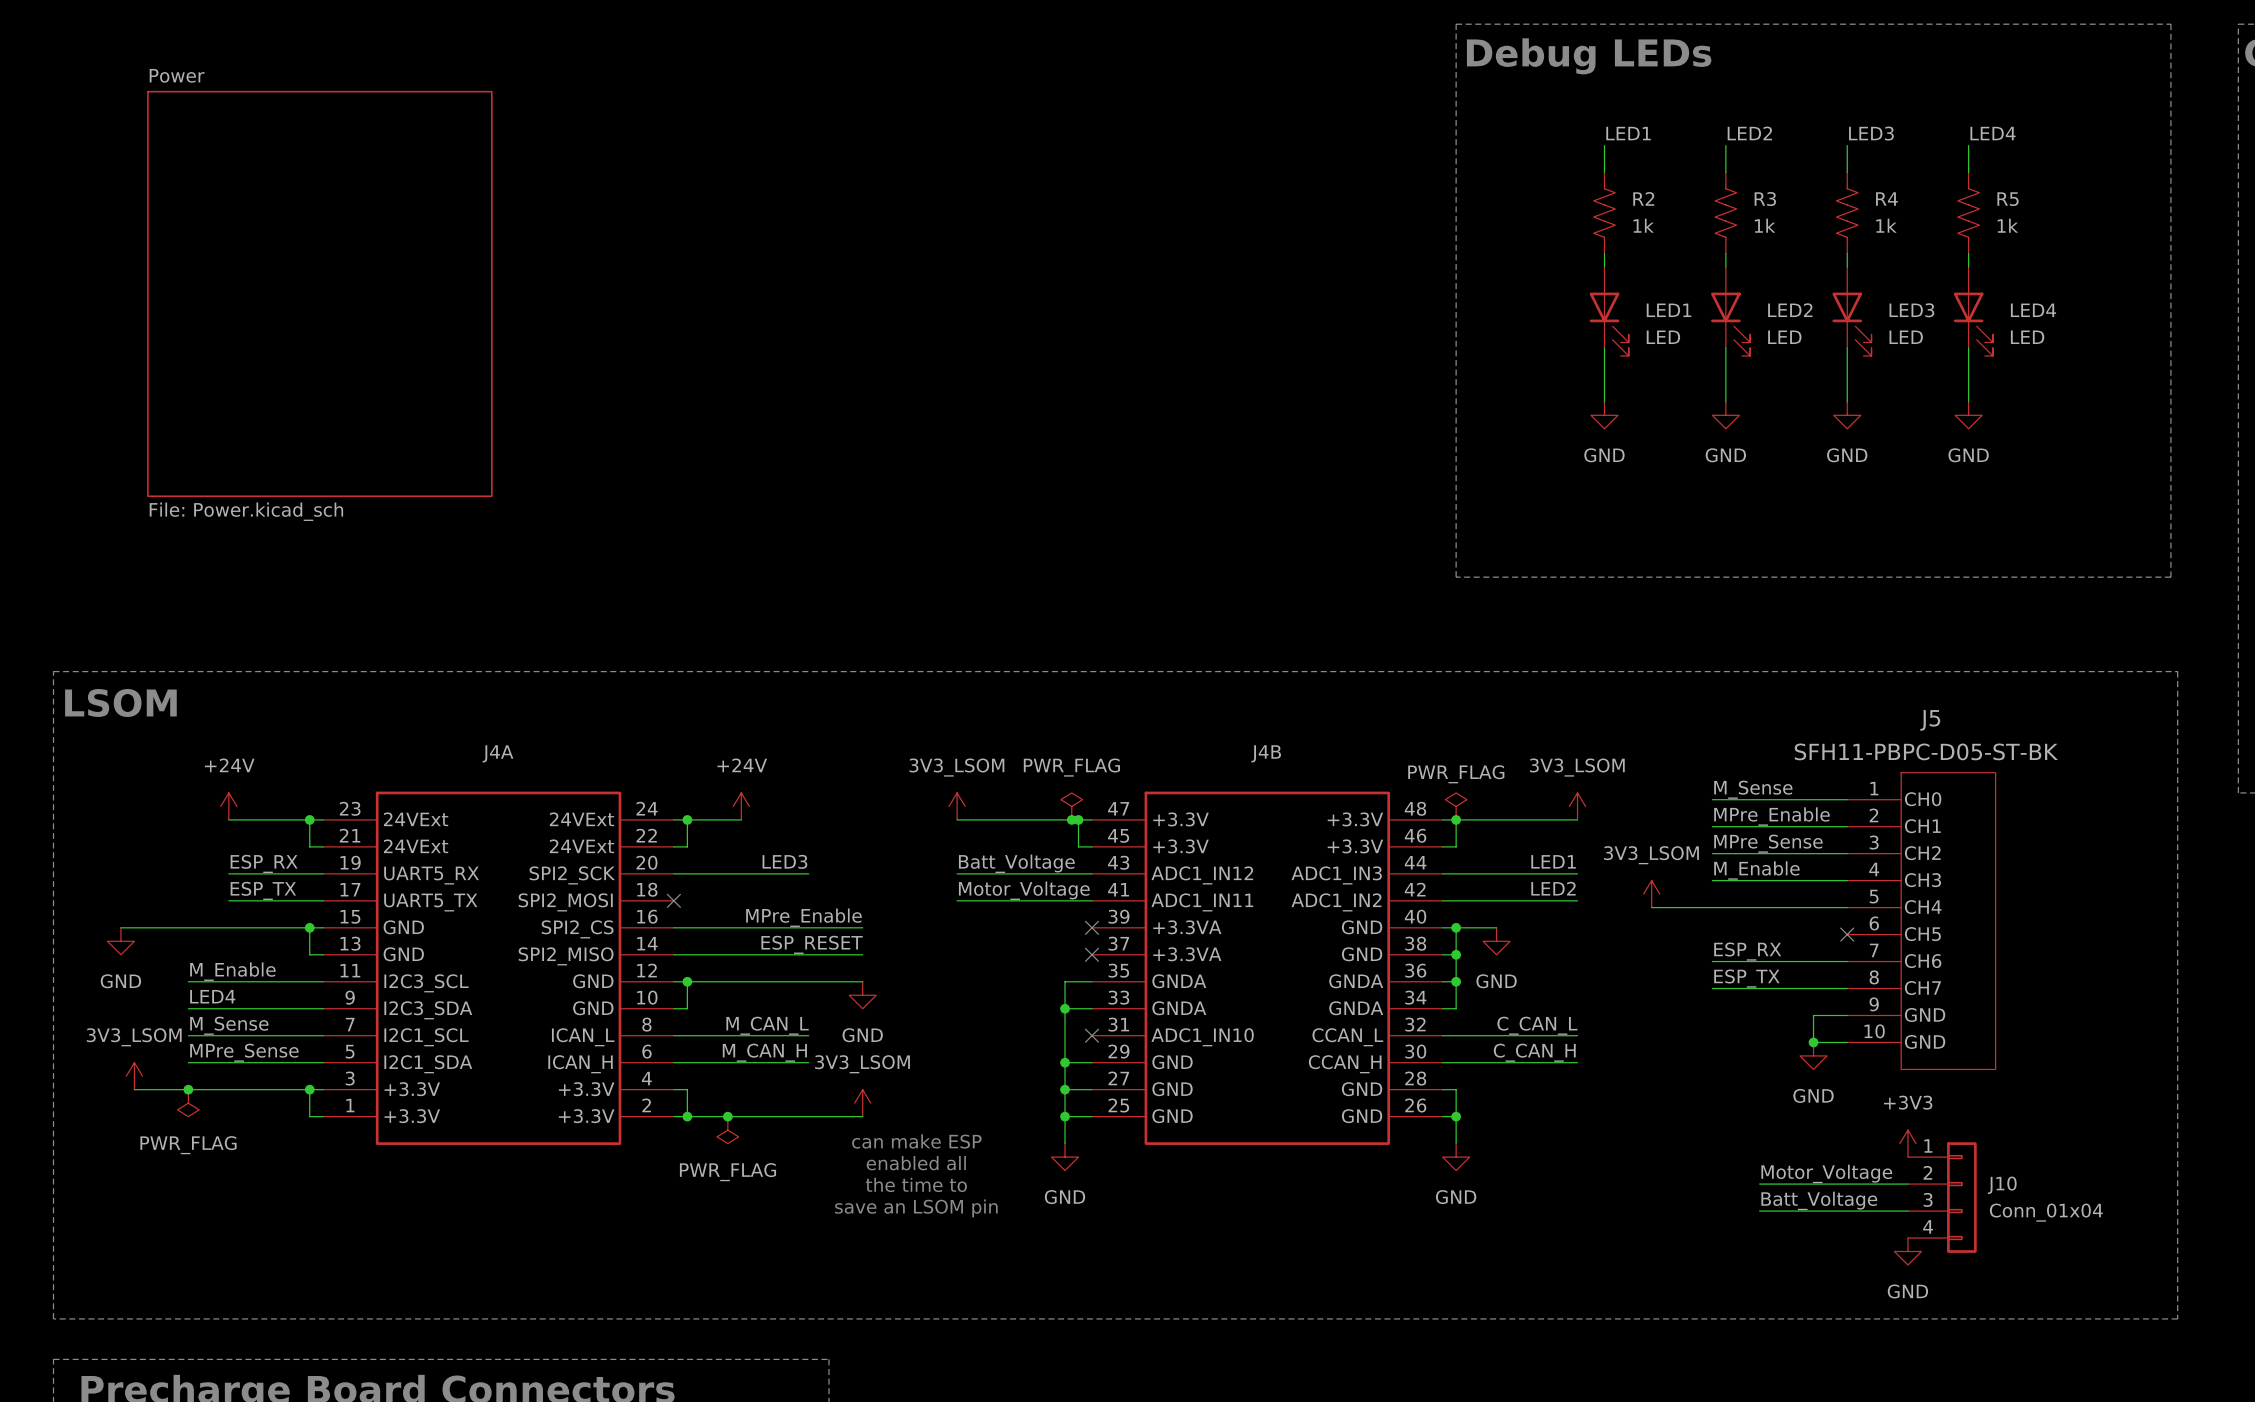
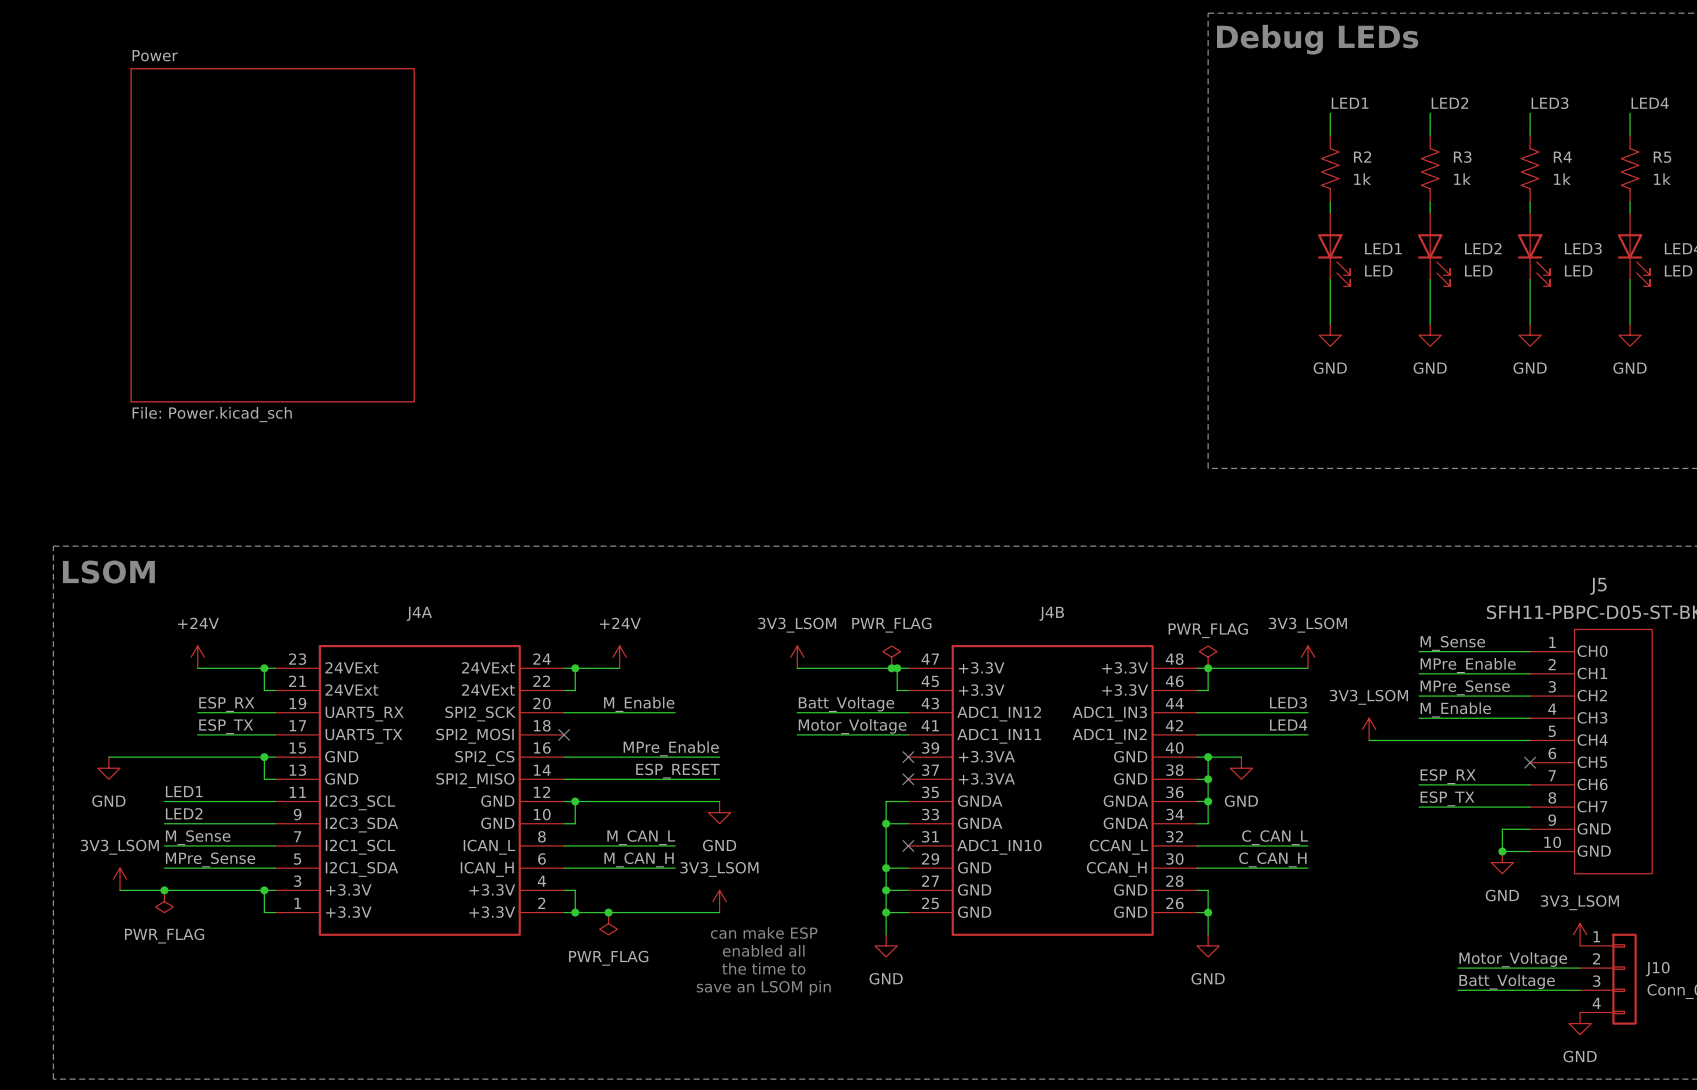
label: LED3 (784, 861) -> M_Enable (639, 704)
label: LED1 (1553, 861) -> LED3 (1288, 702)
label: LED2 (1553, 888) -> LED4 (1288, 725)
label: M_Enable (232, 971) -> LED1 (184, 791)
label: LED4 (212, 996) -> LED2 (184, 813)
power symbol: +3V3 (1907, 1143) -> 3V3_LSOM (1580, 934)

